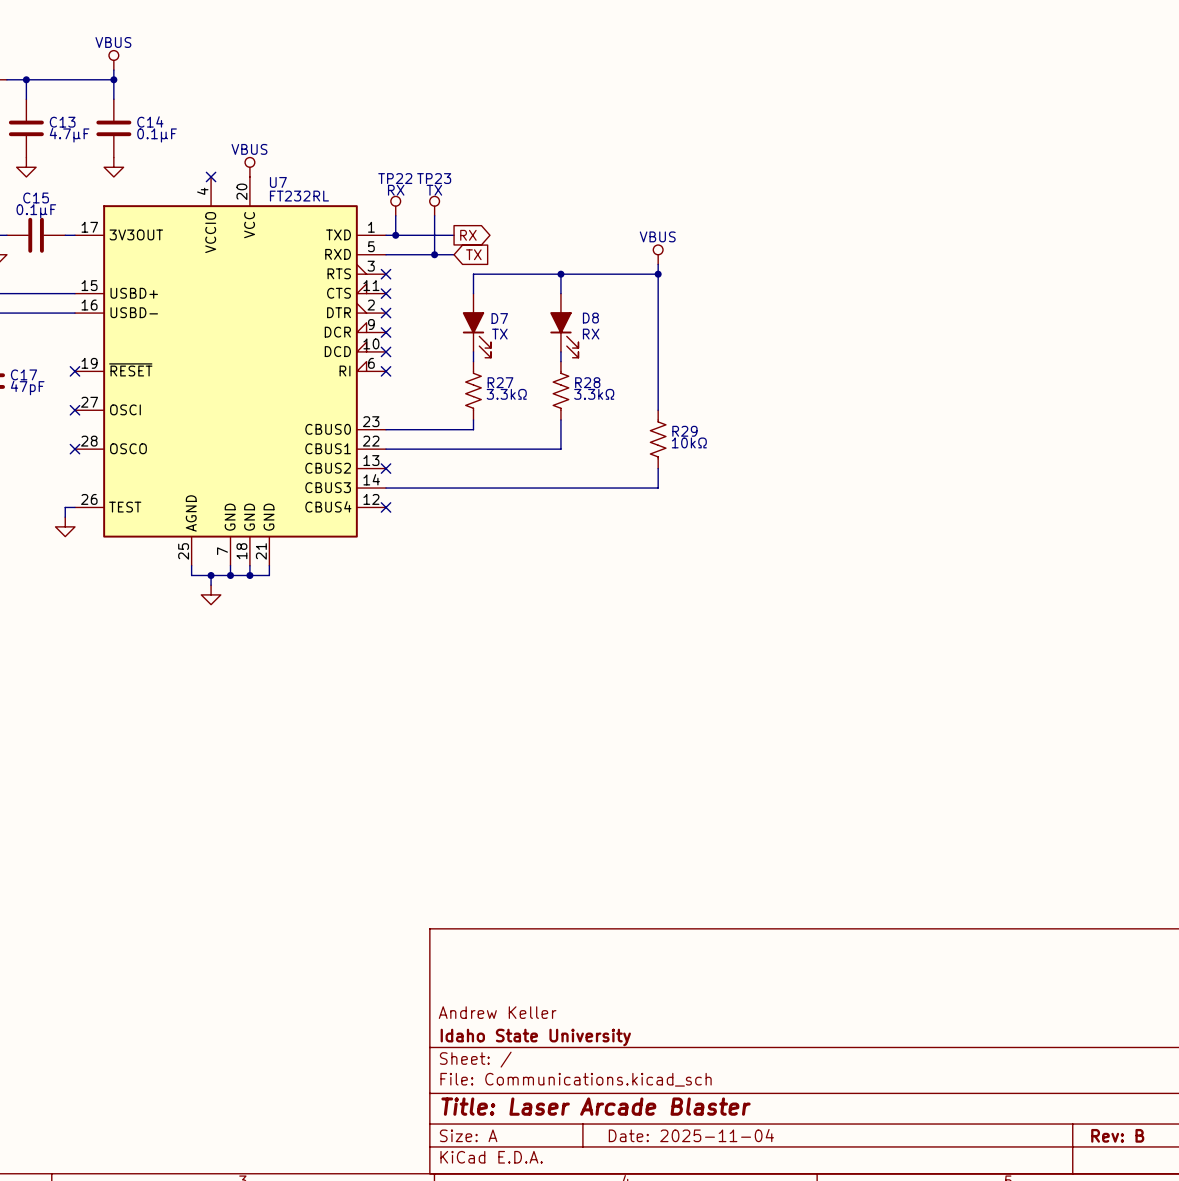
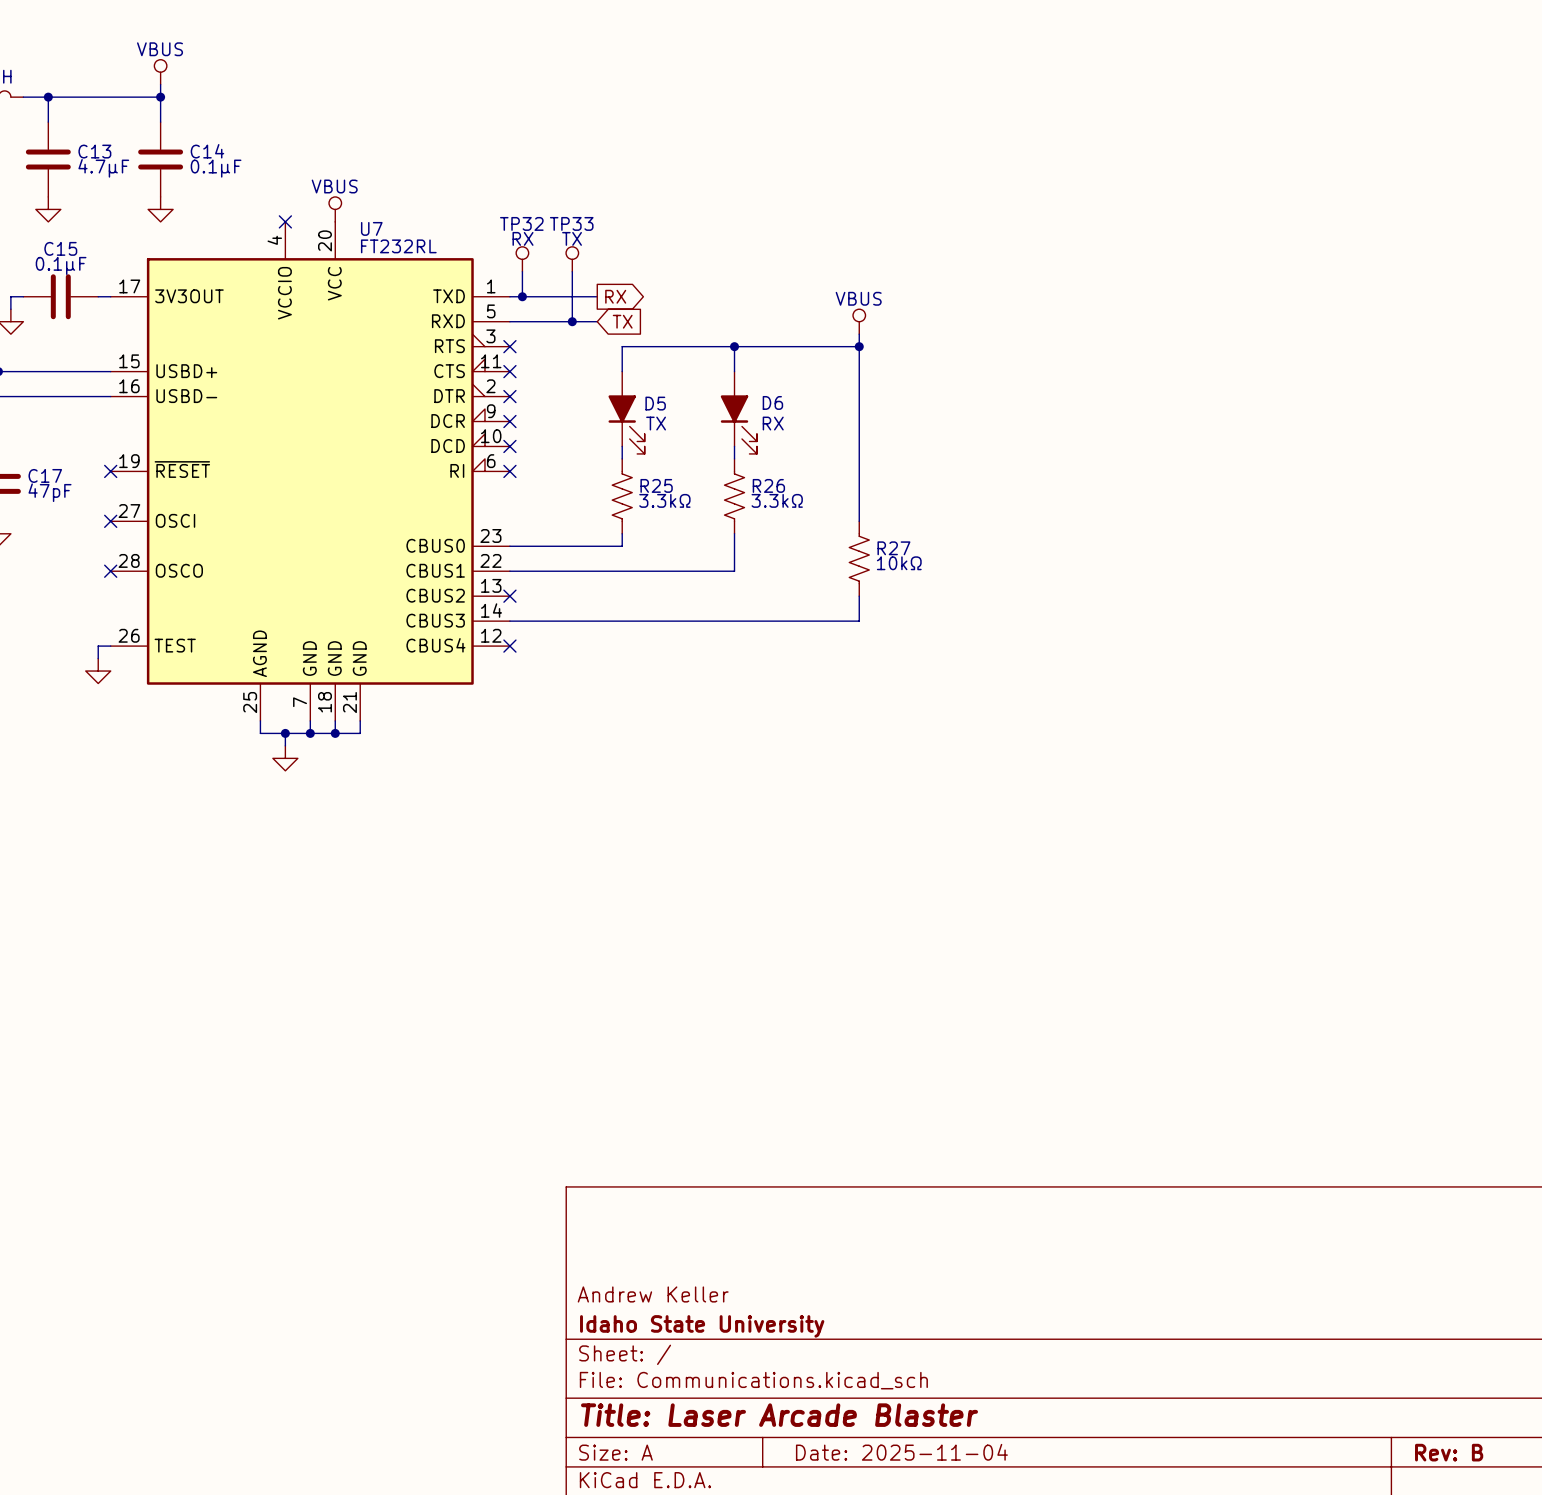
TP22 name: TP22 (395, 178) -> TP32 (521, 223)
TP23 name: TP23 (434, 178) -> TP33 (571, 223)
D7 name: D7 (499, 318) -> D5 (655, 403)
D8 name: D8 (590, 318) -> D6 (772, 402)
R27 name: R27 (500, 382) -> R25 (656, 485)
R28 name: R28 (587, 382) -> R26 (768, 485)
R29 name: R29 (684, 431) -> R27 (893, 548)

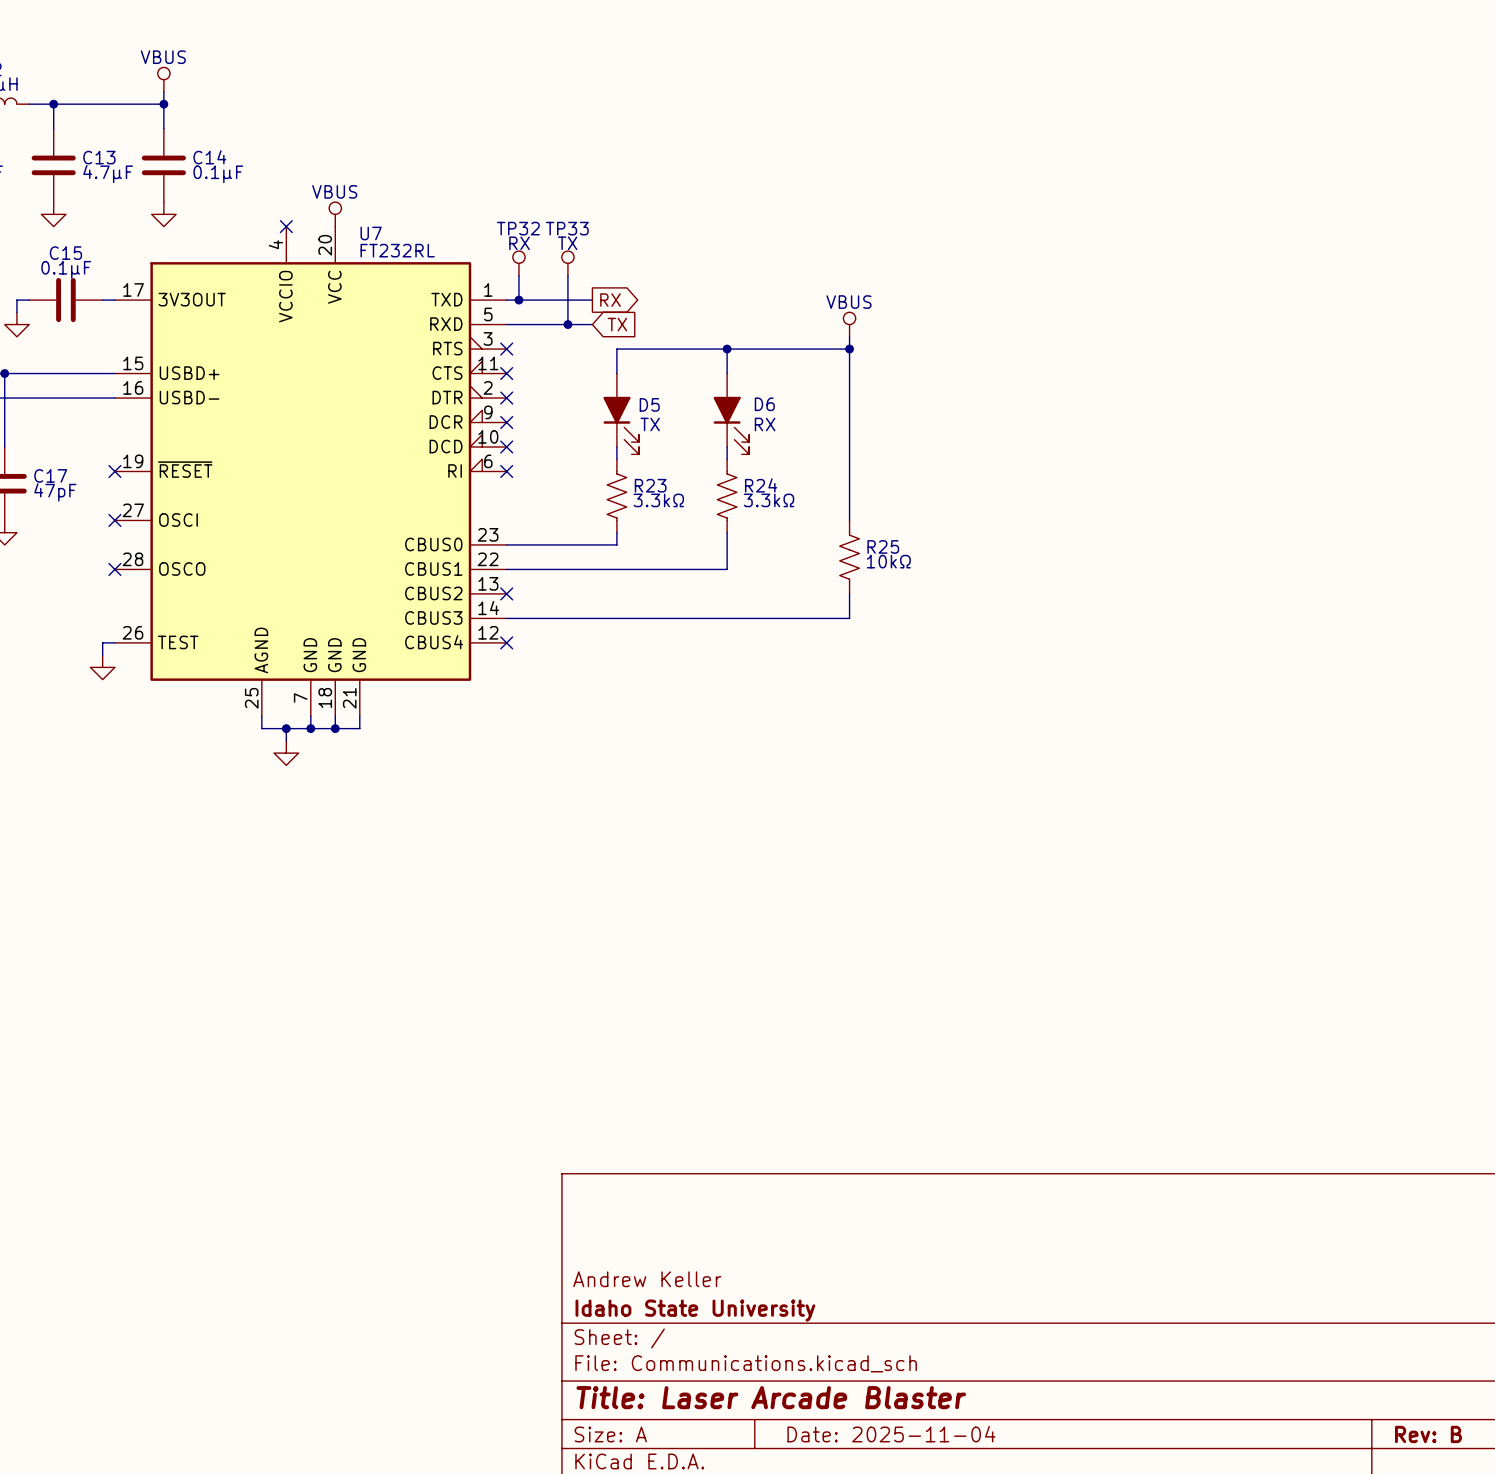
R25 name: R25 (656, 485) -> R23 (650, 485)
R26 name: R26 (768, 485) -> R24 (761, 485)
R27 name: R27 (893, 548) -> R25 (883, 546)

